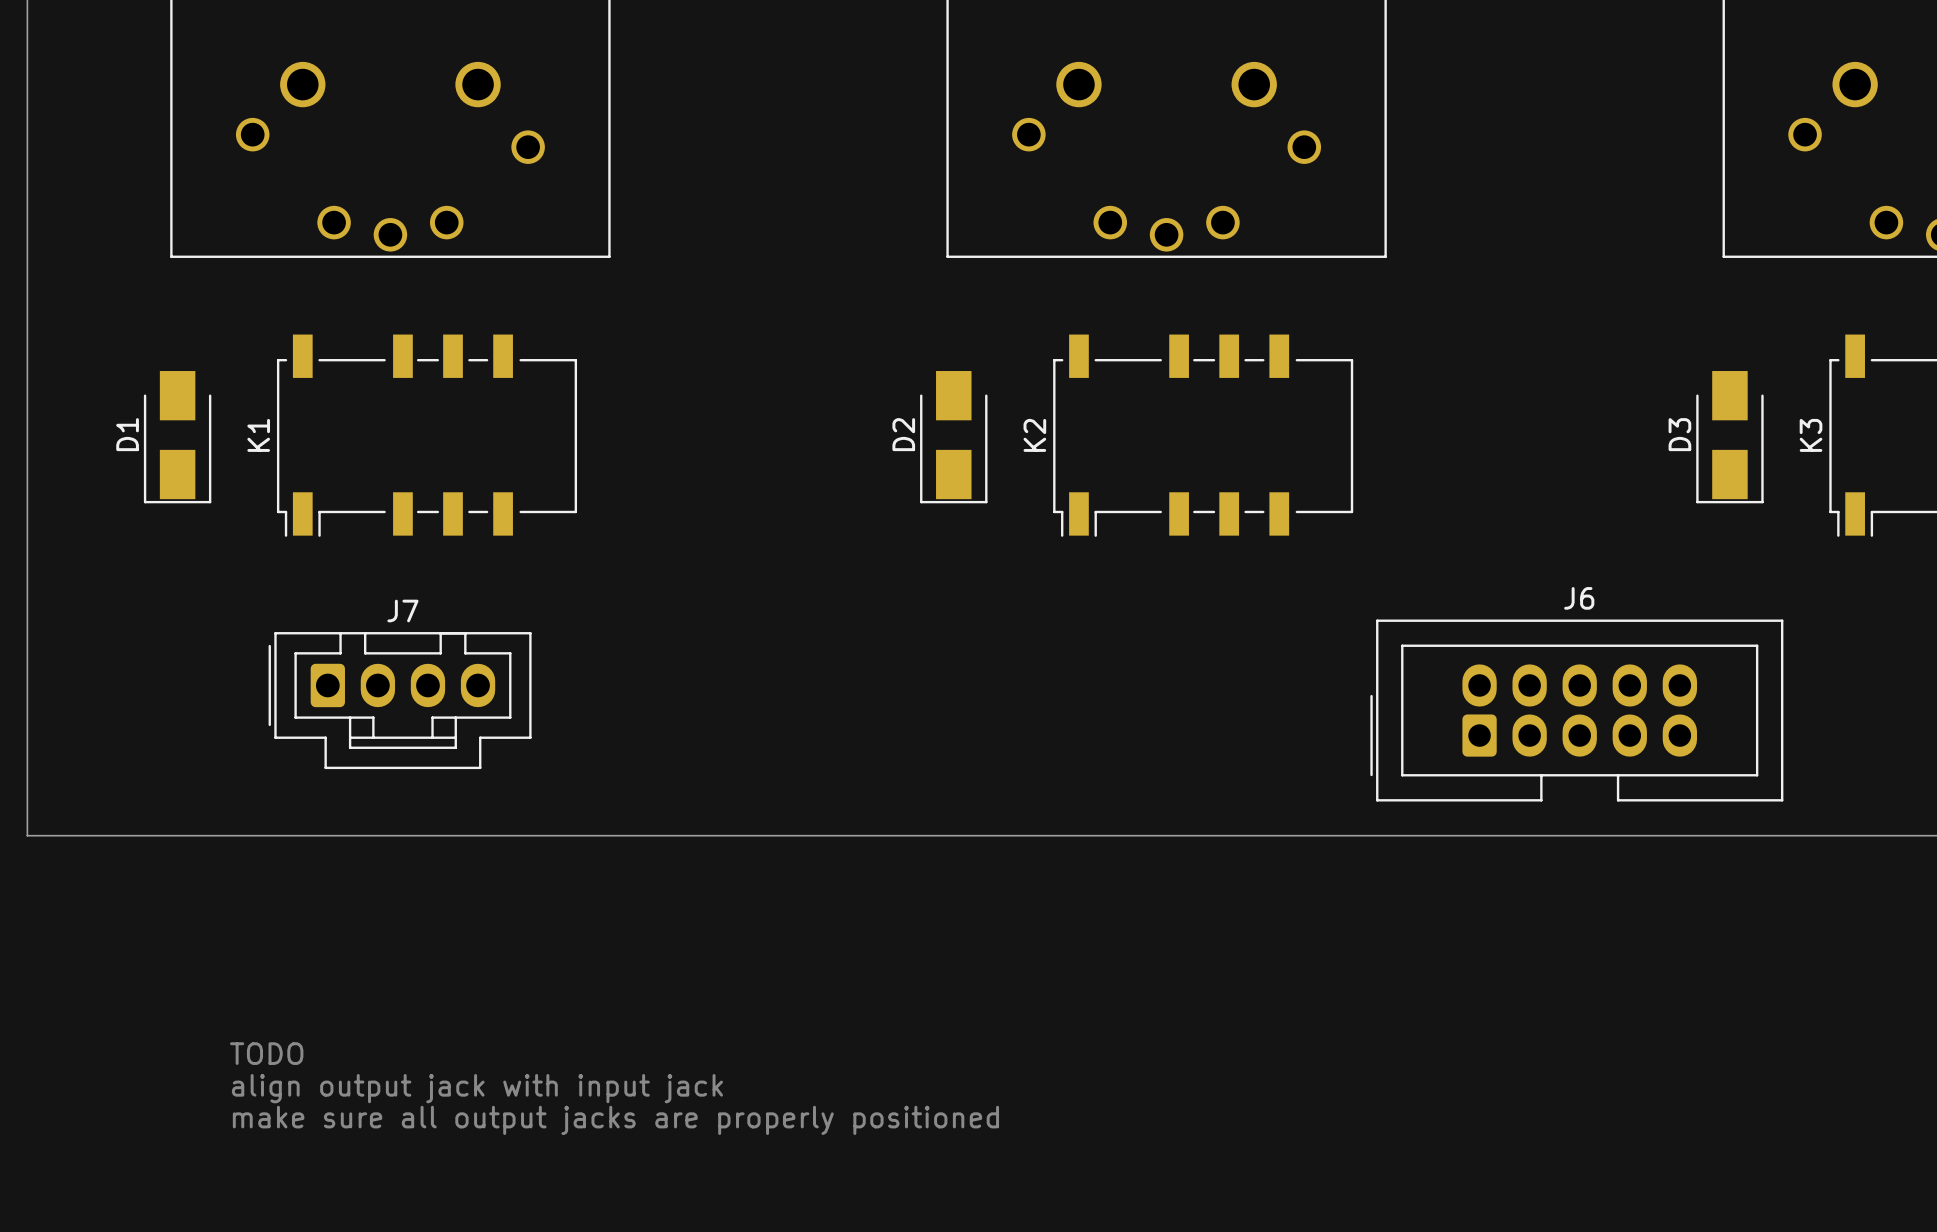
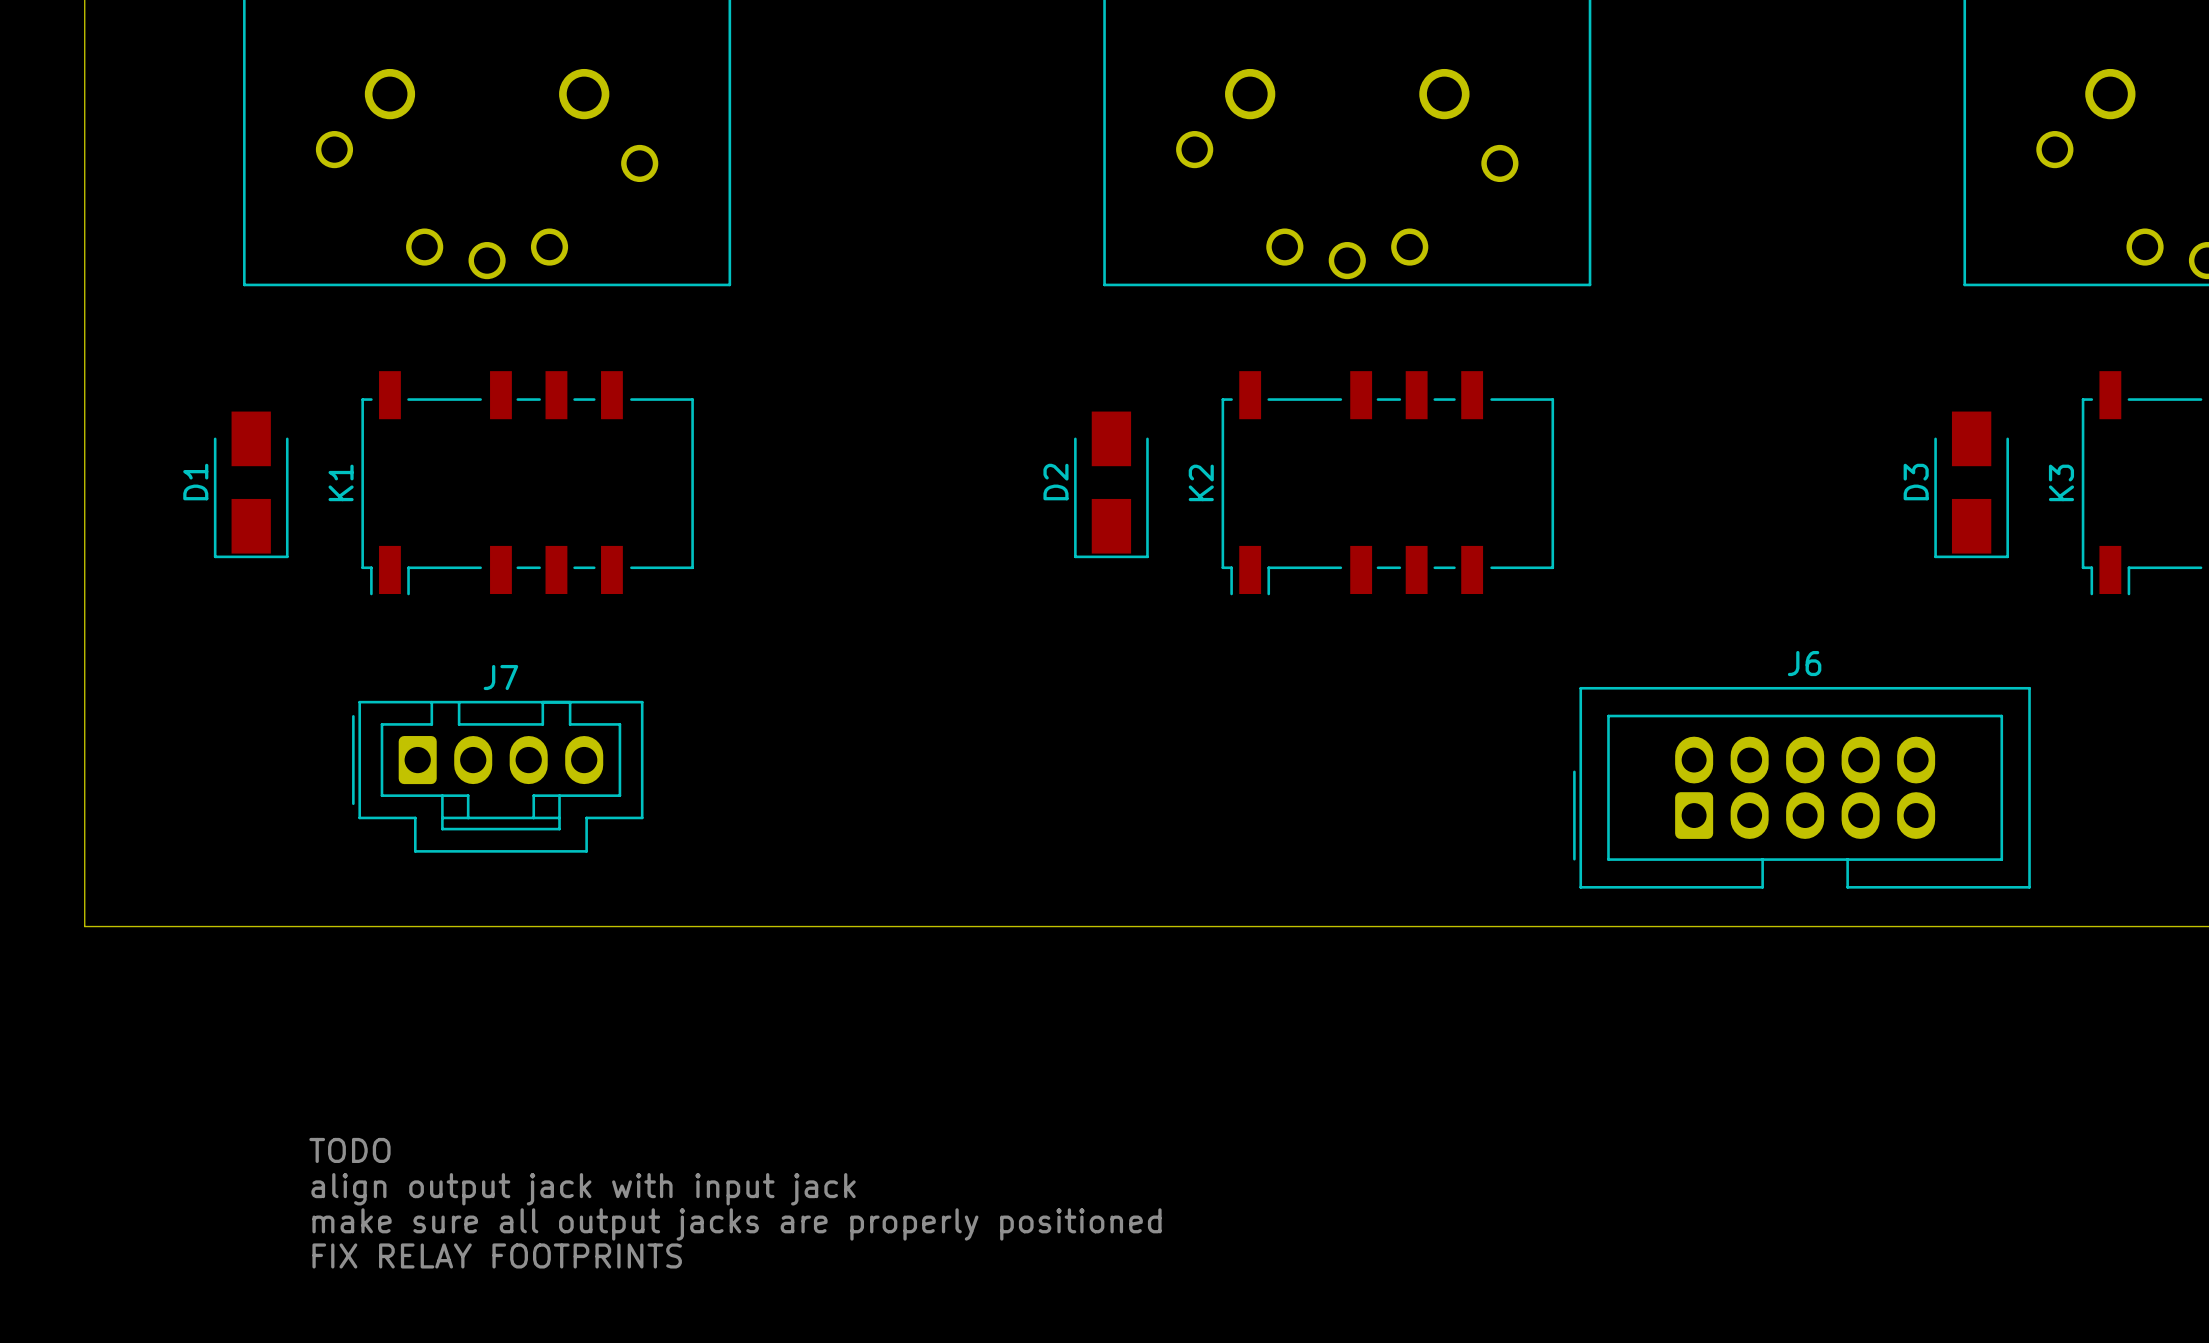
text position: TODO (266, 1053) -> TODO (349, 1150)
text position: align output jack with input jack (477, 1088) -> align output jack with input jack (583, 1189)
text position: make sure all output jacks are properly positioned (615, 1120) -> make sure all output jacks are properly positioned (737, 1224)
text: none -> FIX RELAY FOOTPRINTS (497, 1255)

